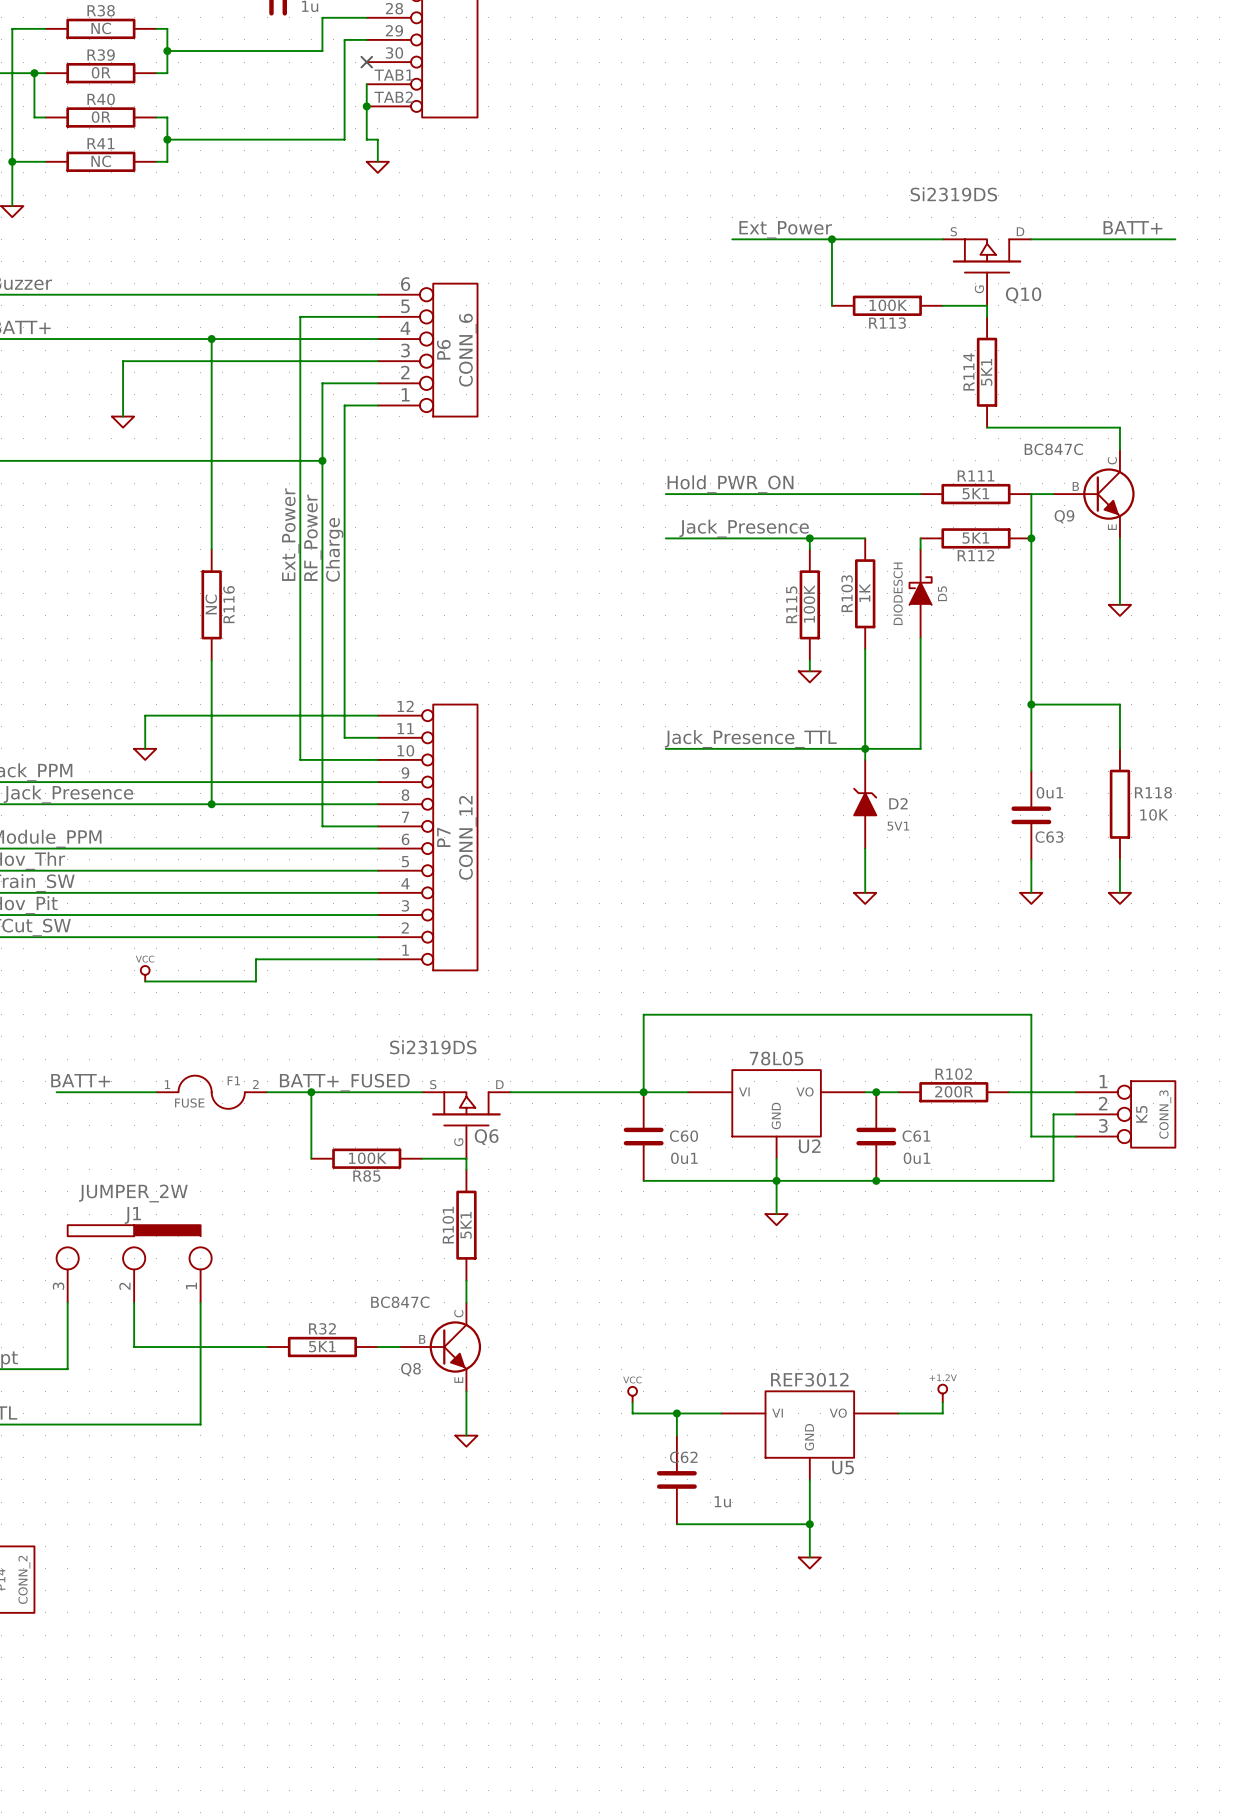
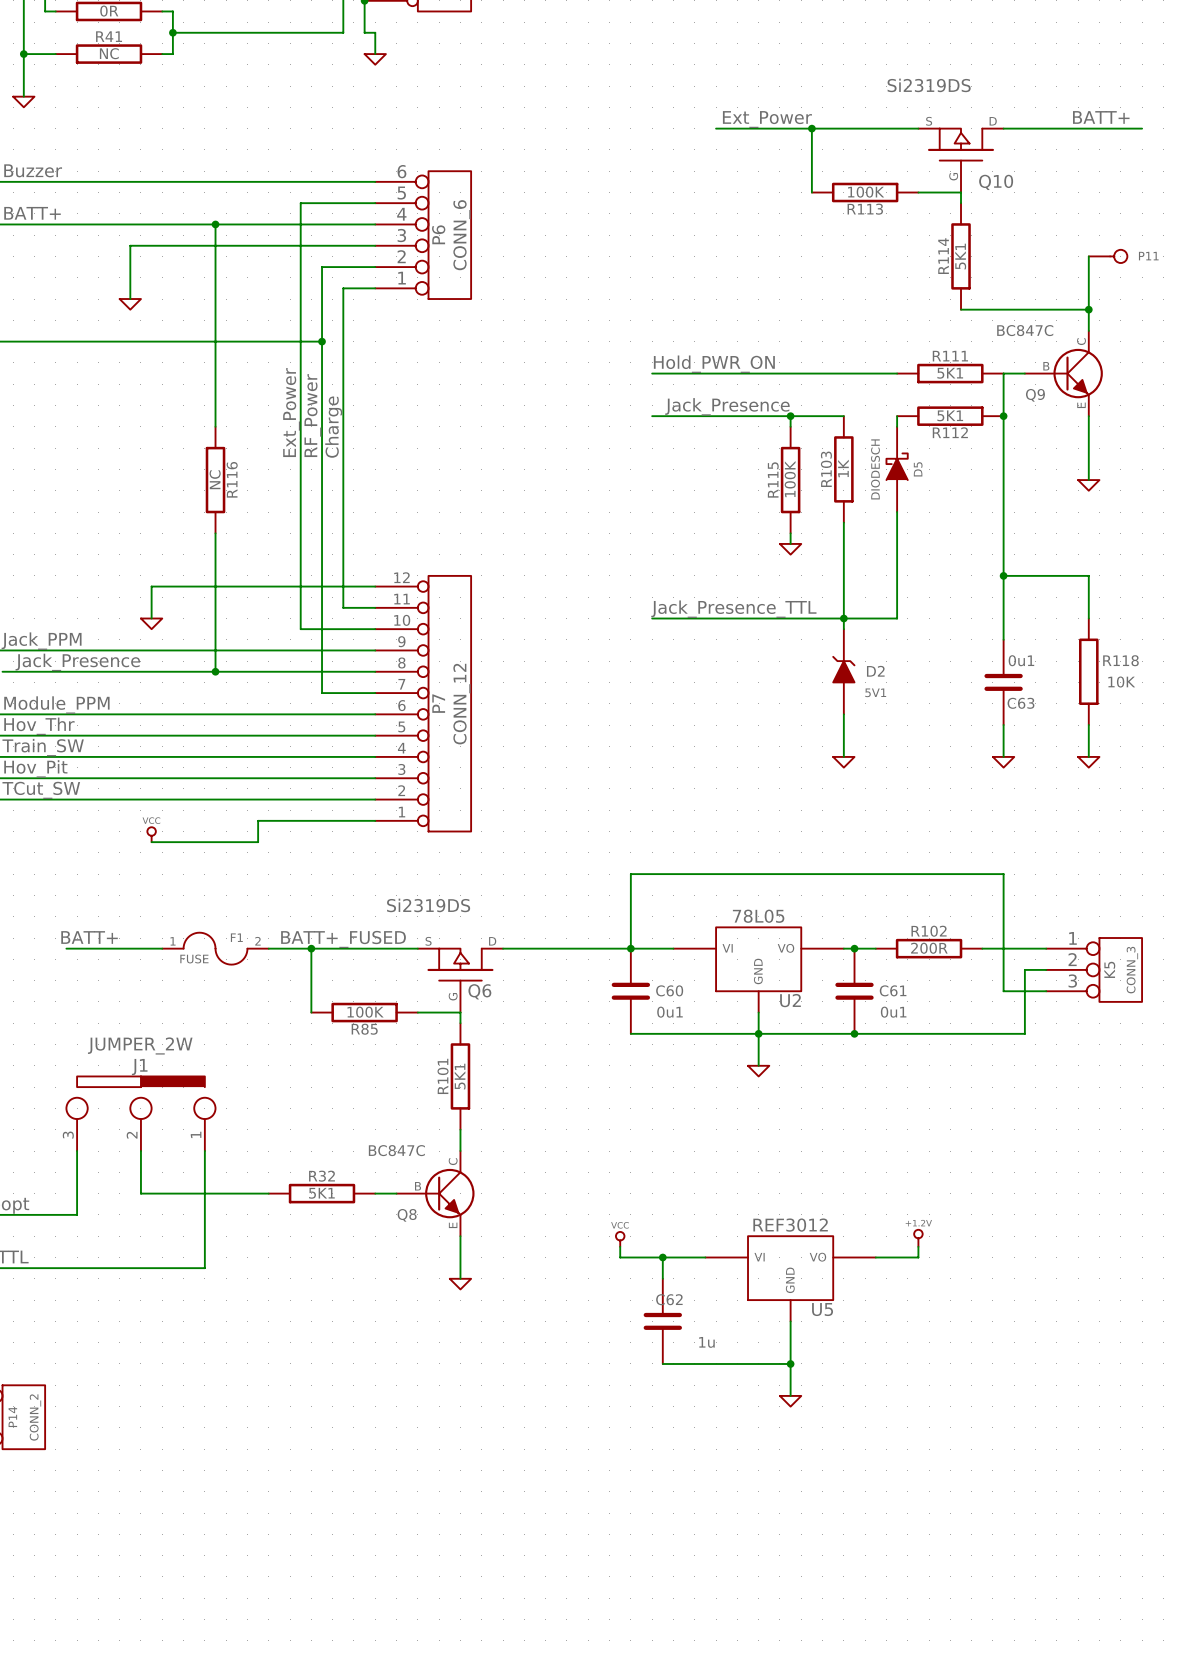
wire: none -> (1088, 256) (1088, 309)
P11: none -> (1108, 256)
junction: none -> (1088, 309)

